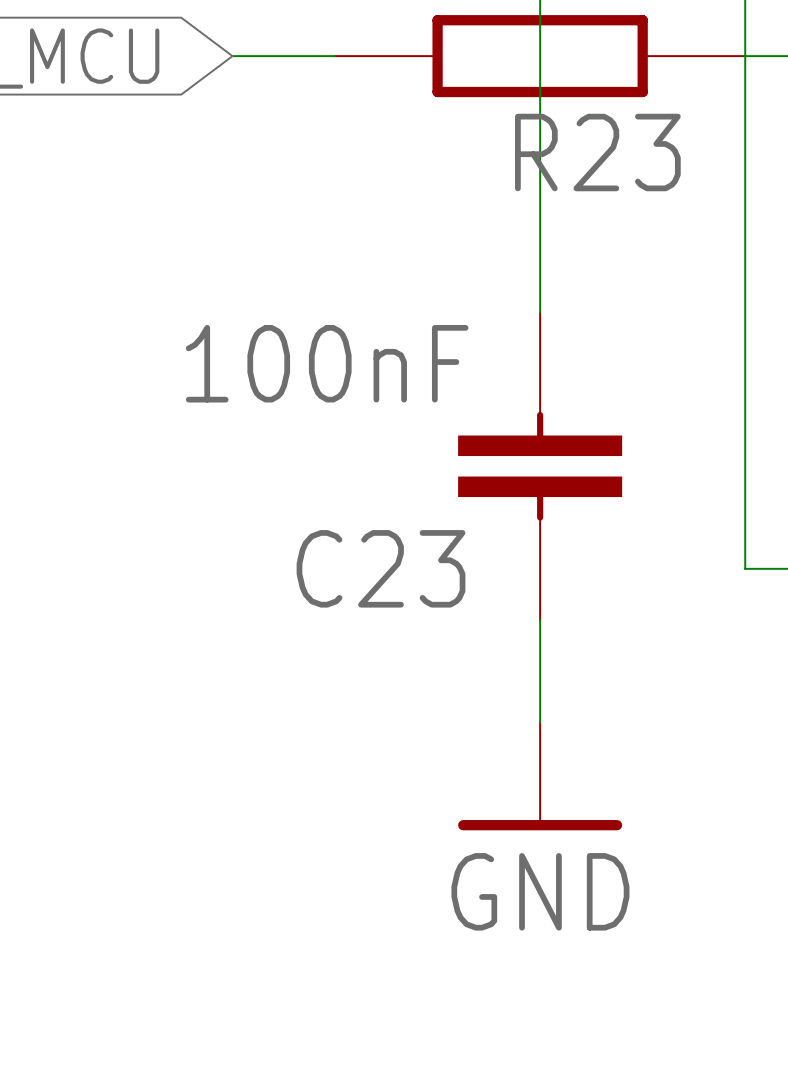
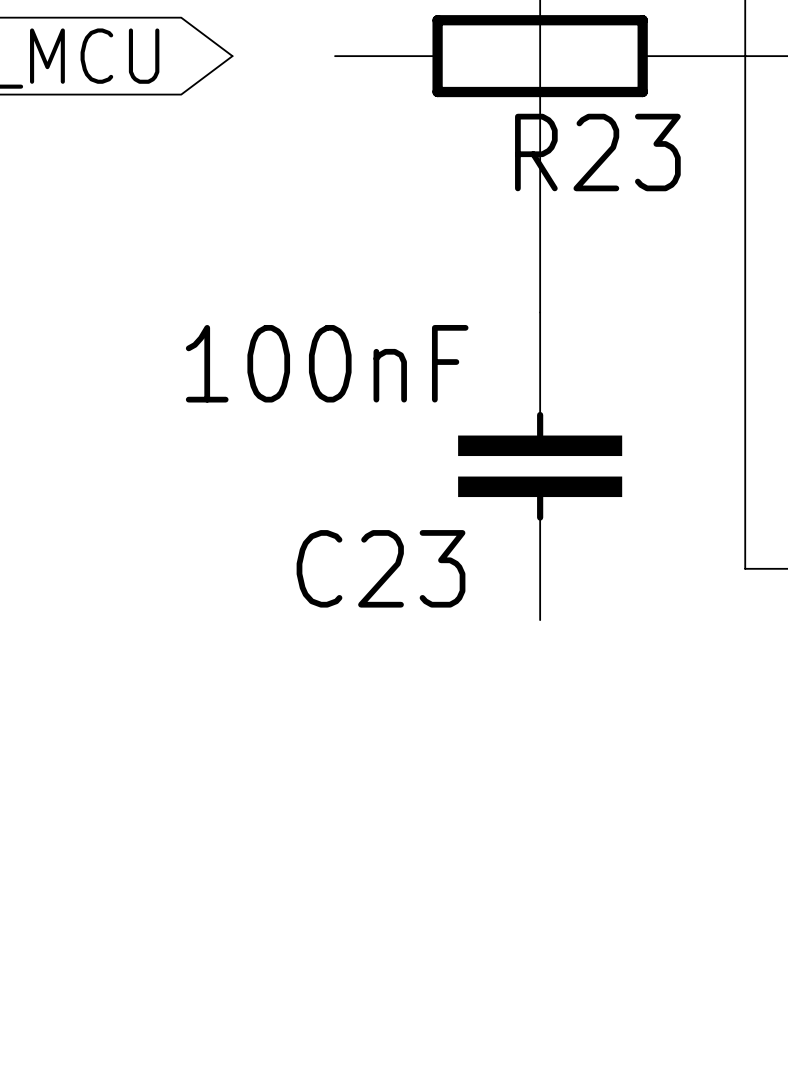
wire: (232, 56) (335, 56) -> none
wire: (540, 620) (540, 722) -> none
power symbol: GND (540, 776) -> none

